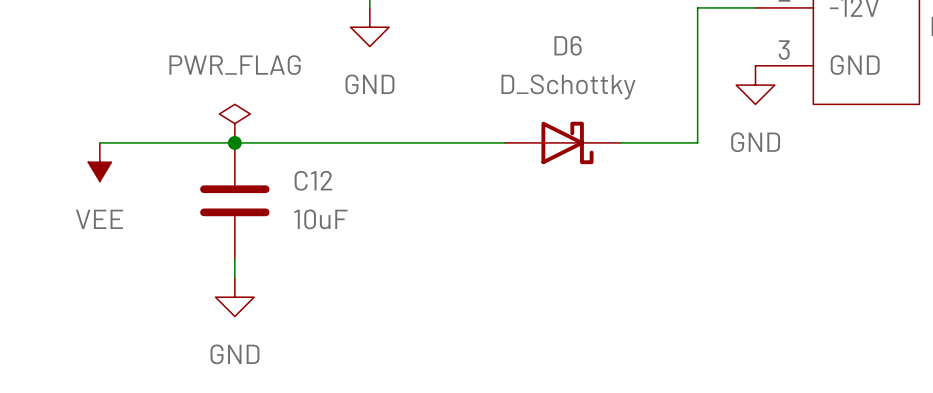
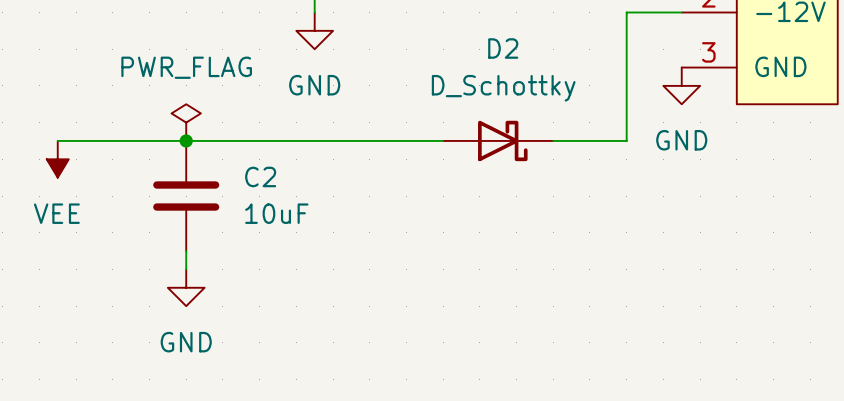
D6 name: D6 (568, 45) -> D2 (503, 48)
C12 name: C12 (313, 180) -> C2 (260, 176)

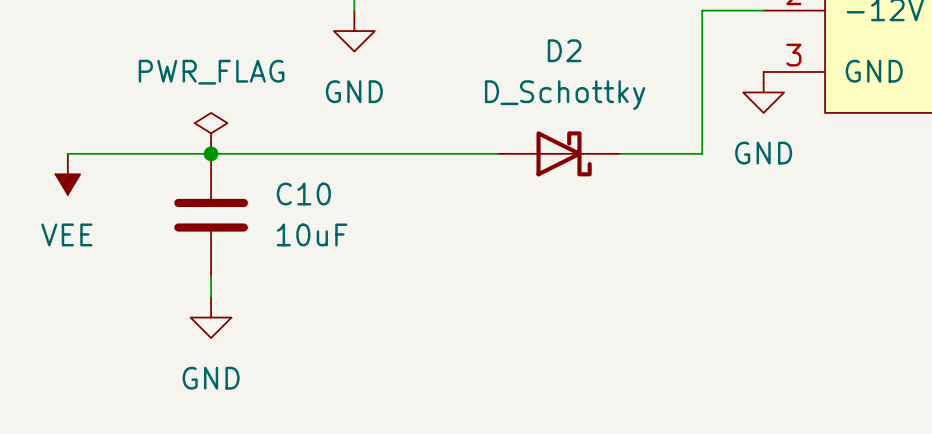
C2 name: C2 (260, 176) -> C10 (303, 194)

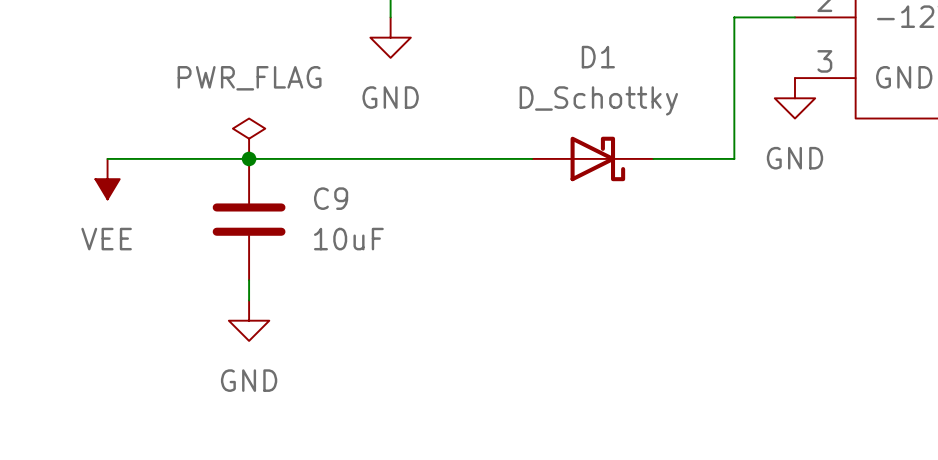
D2 name: D2 (564, 50) -> D1 (598, 57)
C10 name: C10 (303, 194) -> C9 (331, 198)

